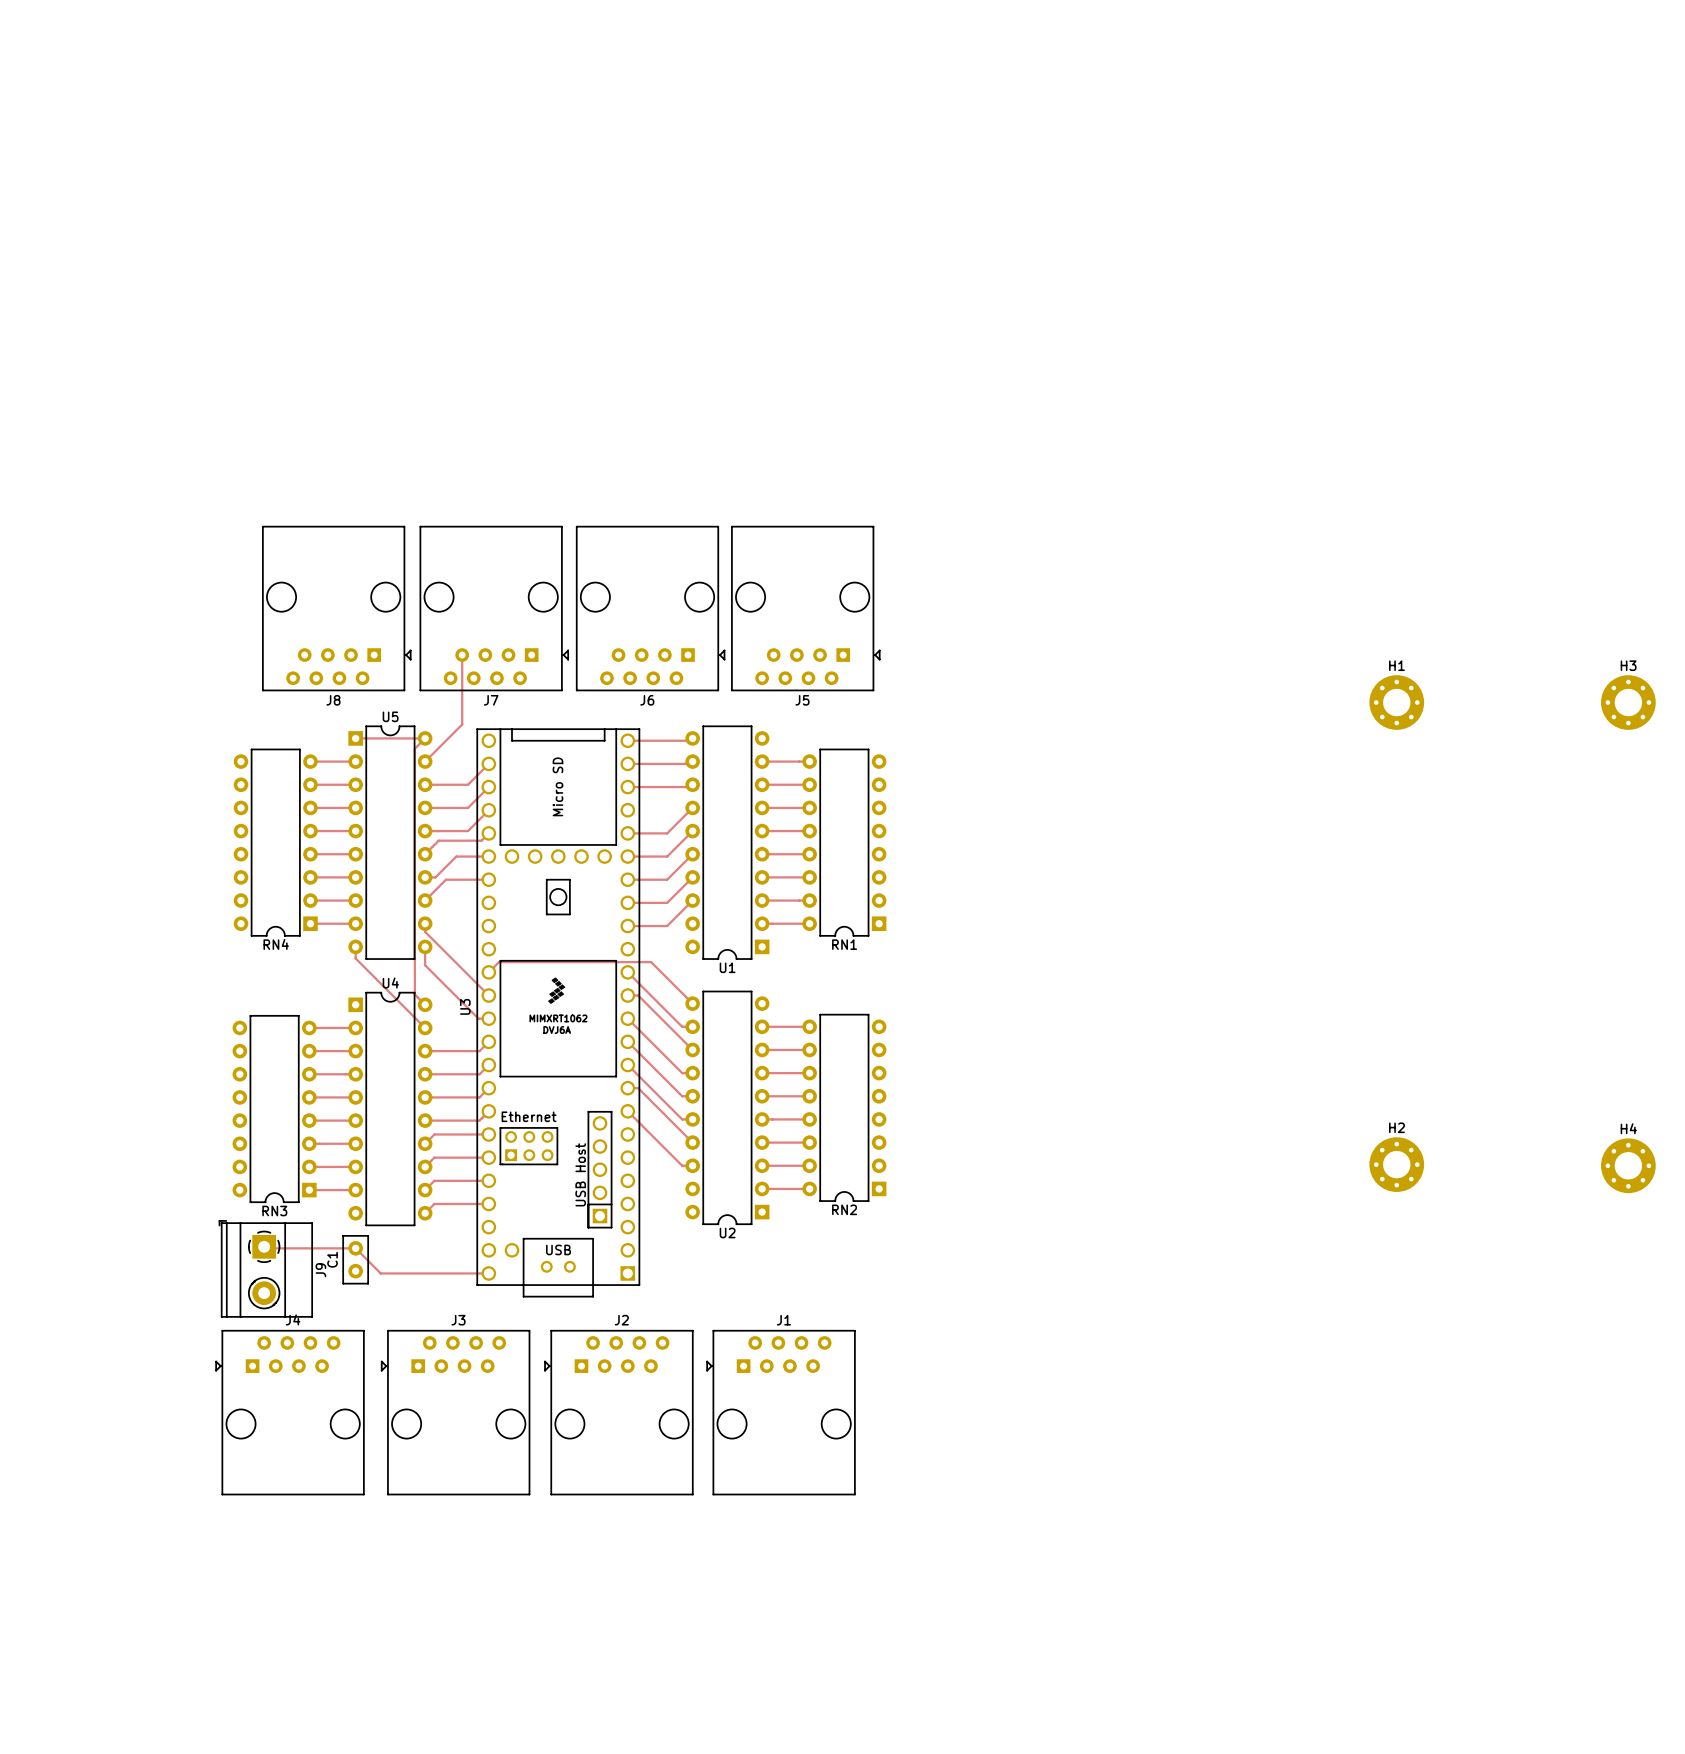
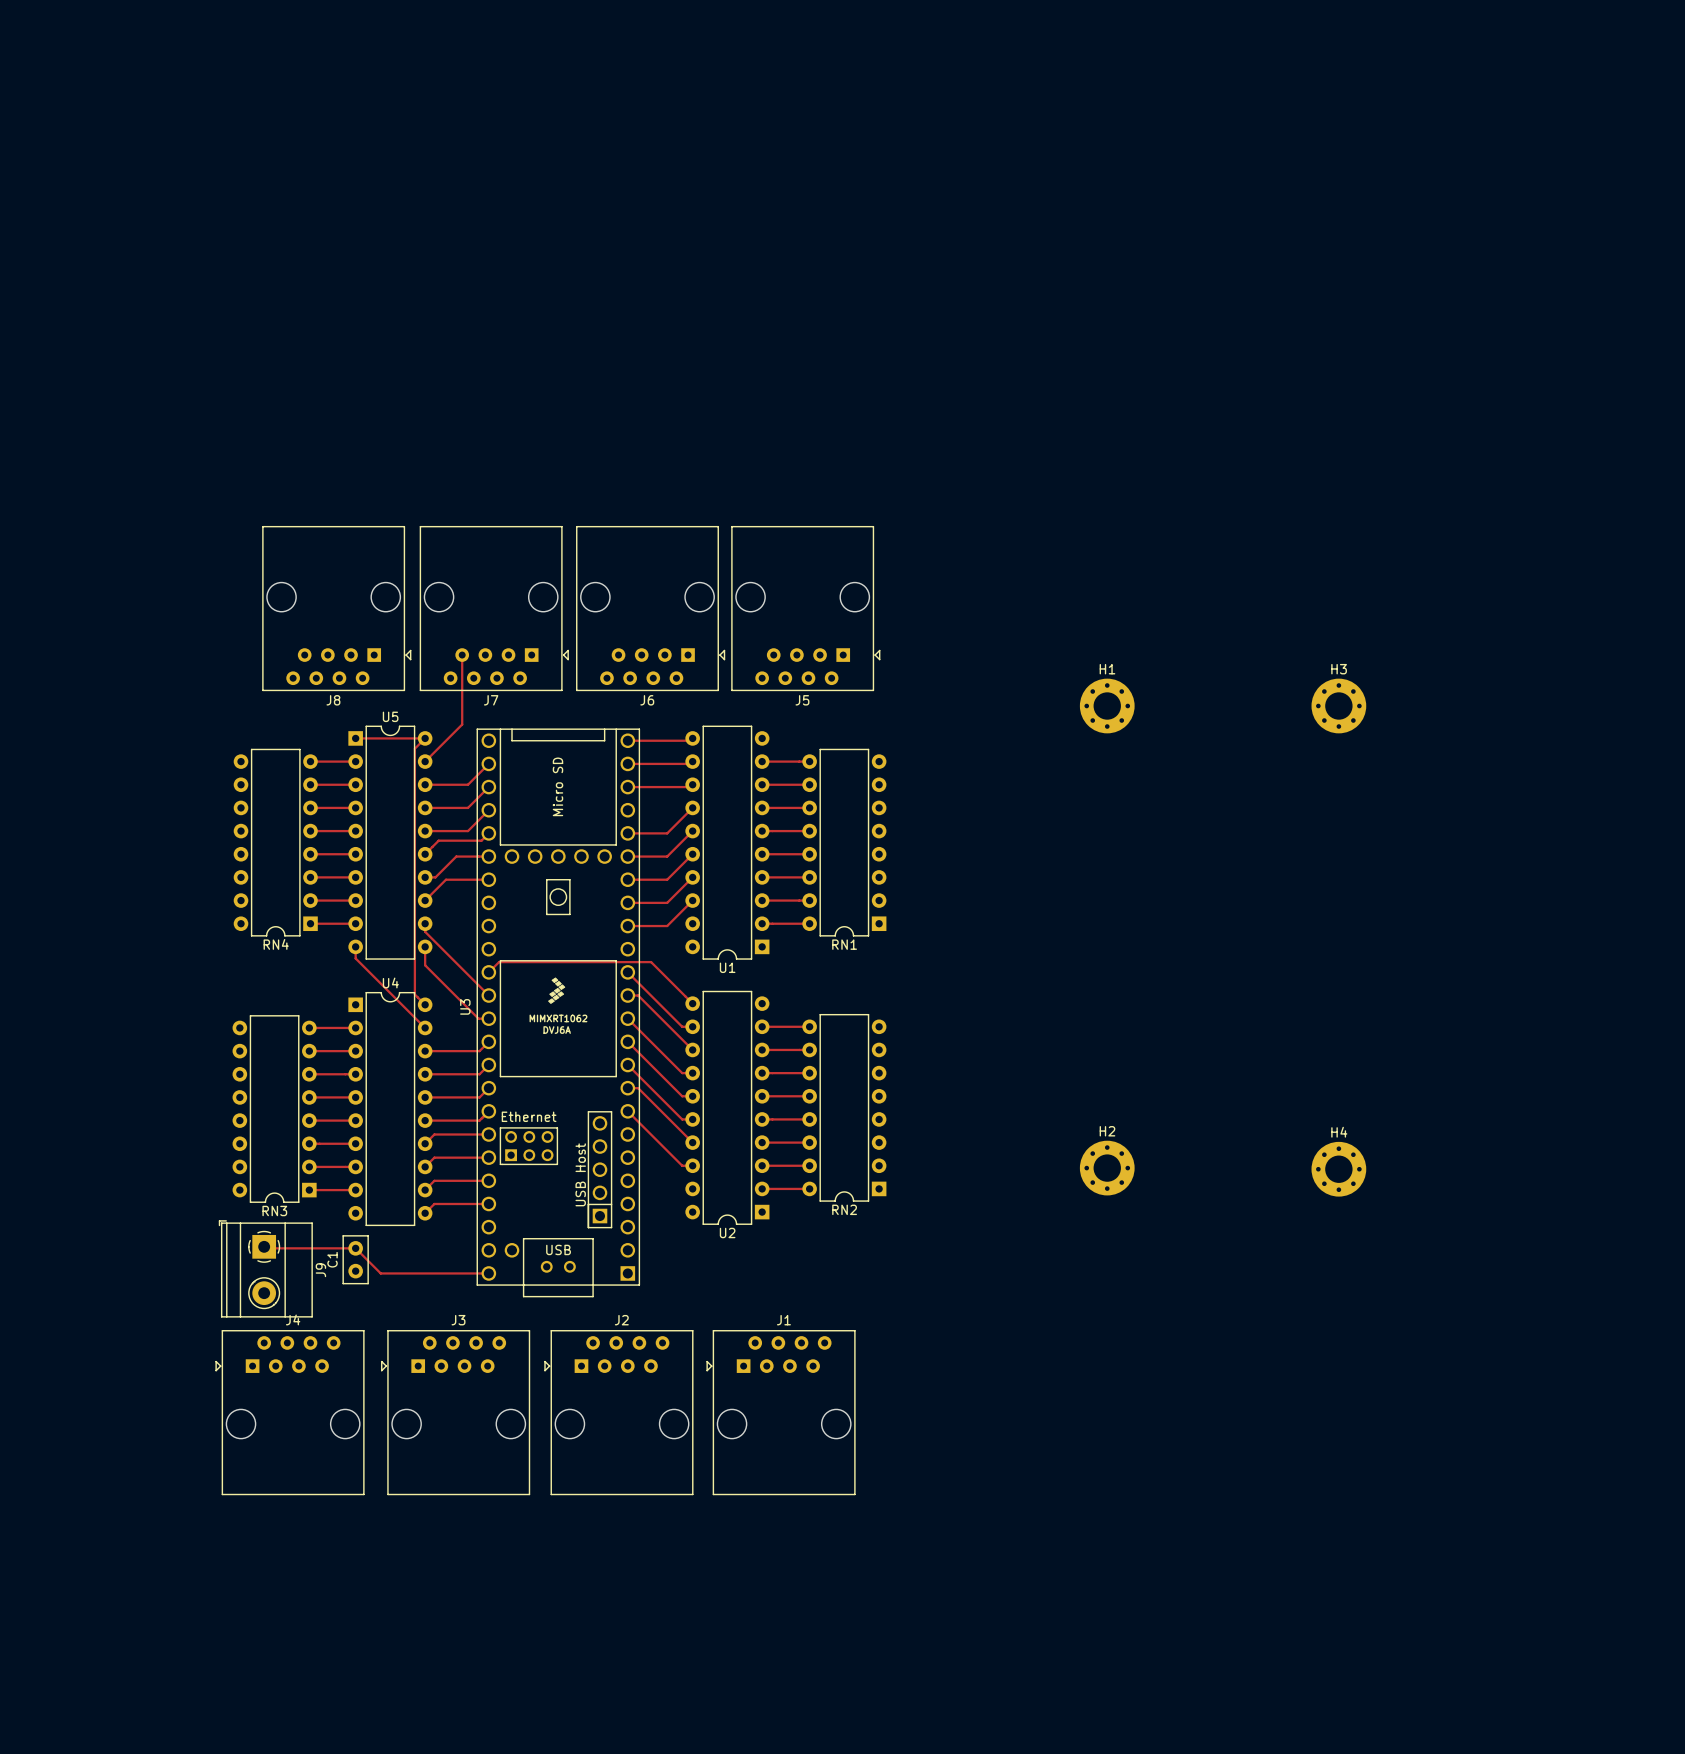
H1 position: (1396, 702) -> (1107, 706)
H3 position: (1628, 702) -> (1338, 706)
H2 position: (1396, 1164) -> (1107, 1168)
H4 position: (1628, 1165) -> (1338, 1169)

